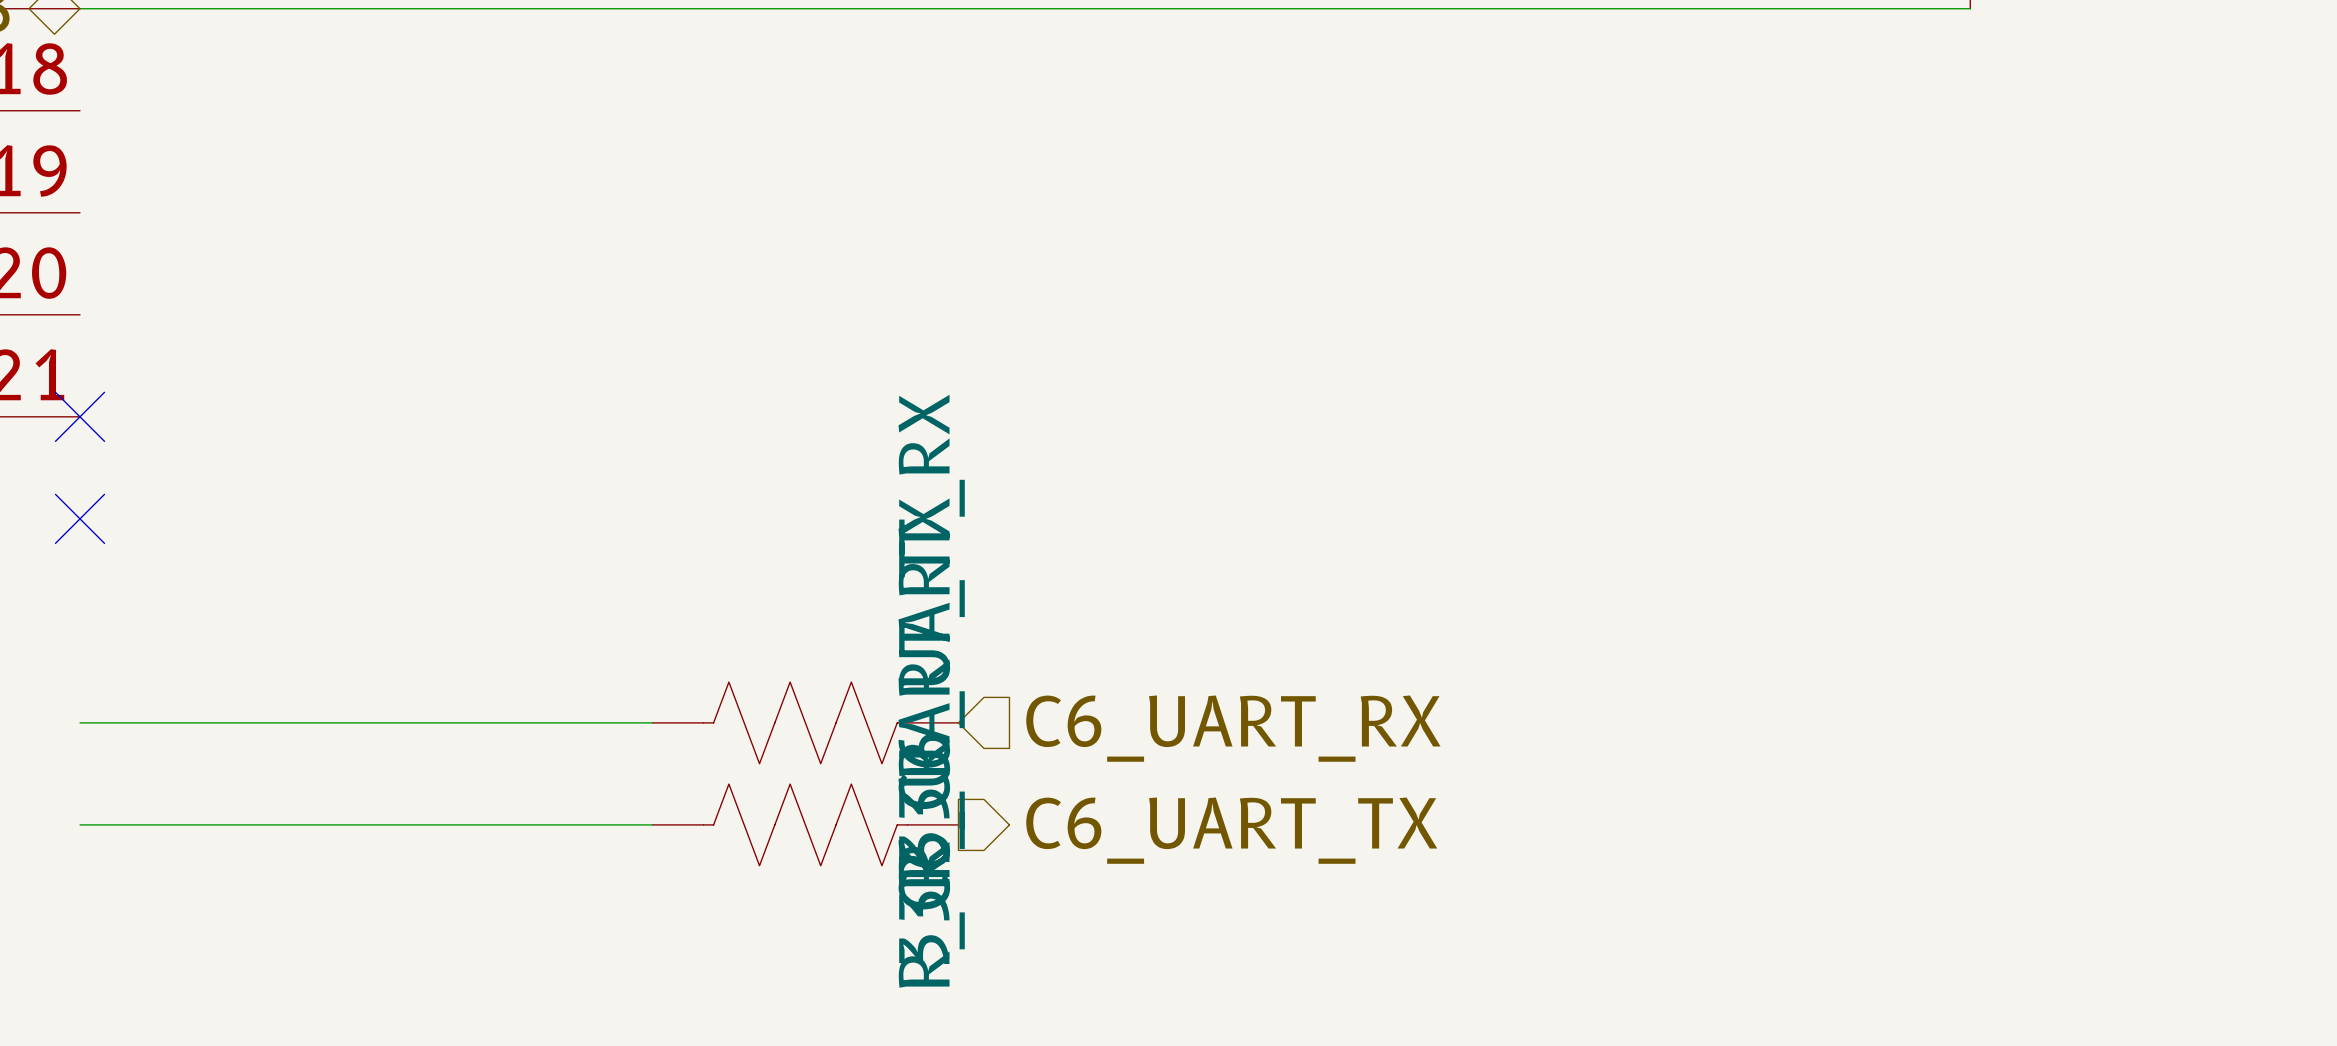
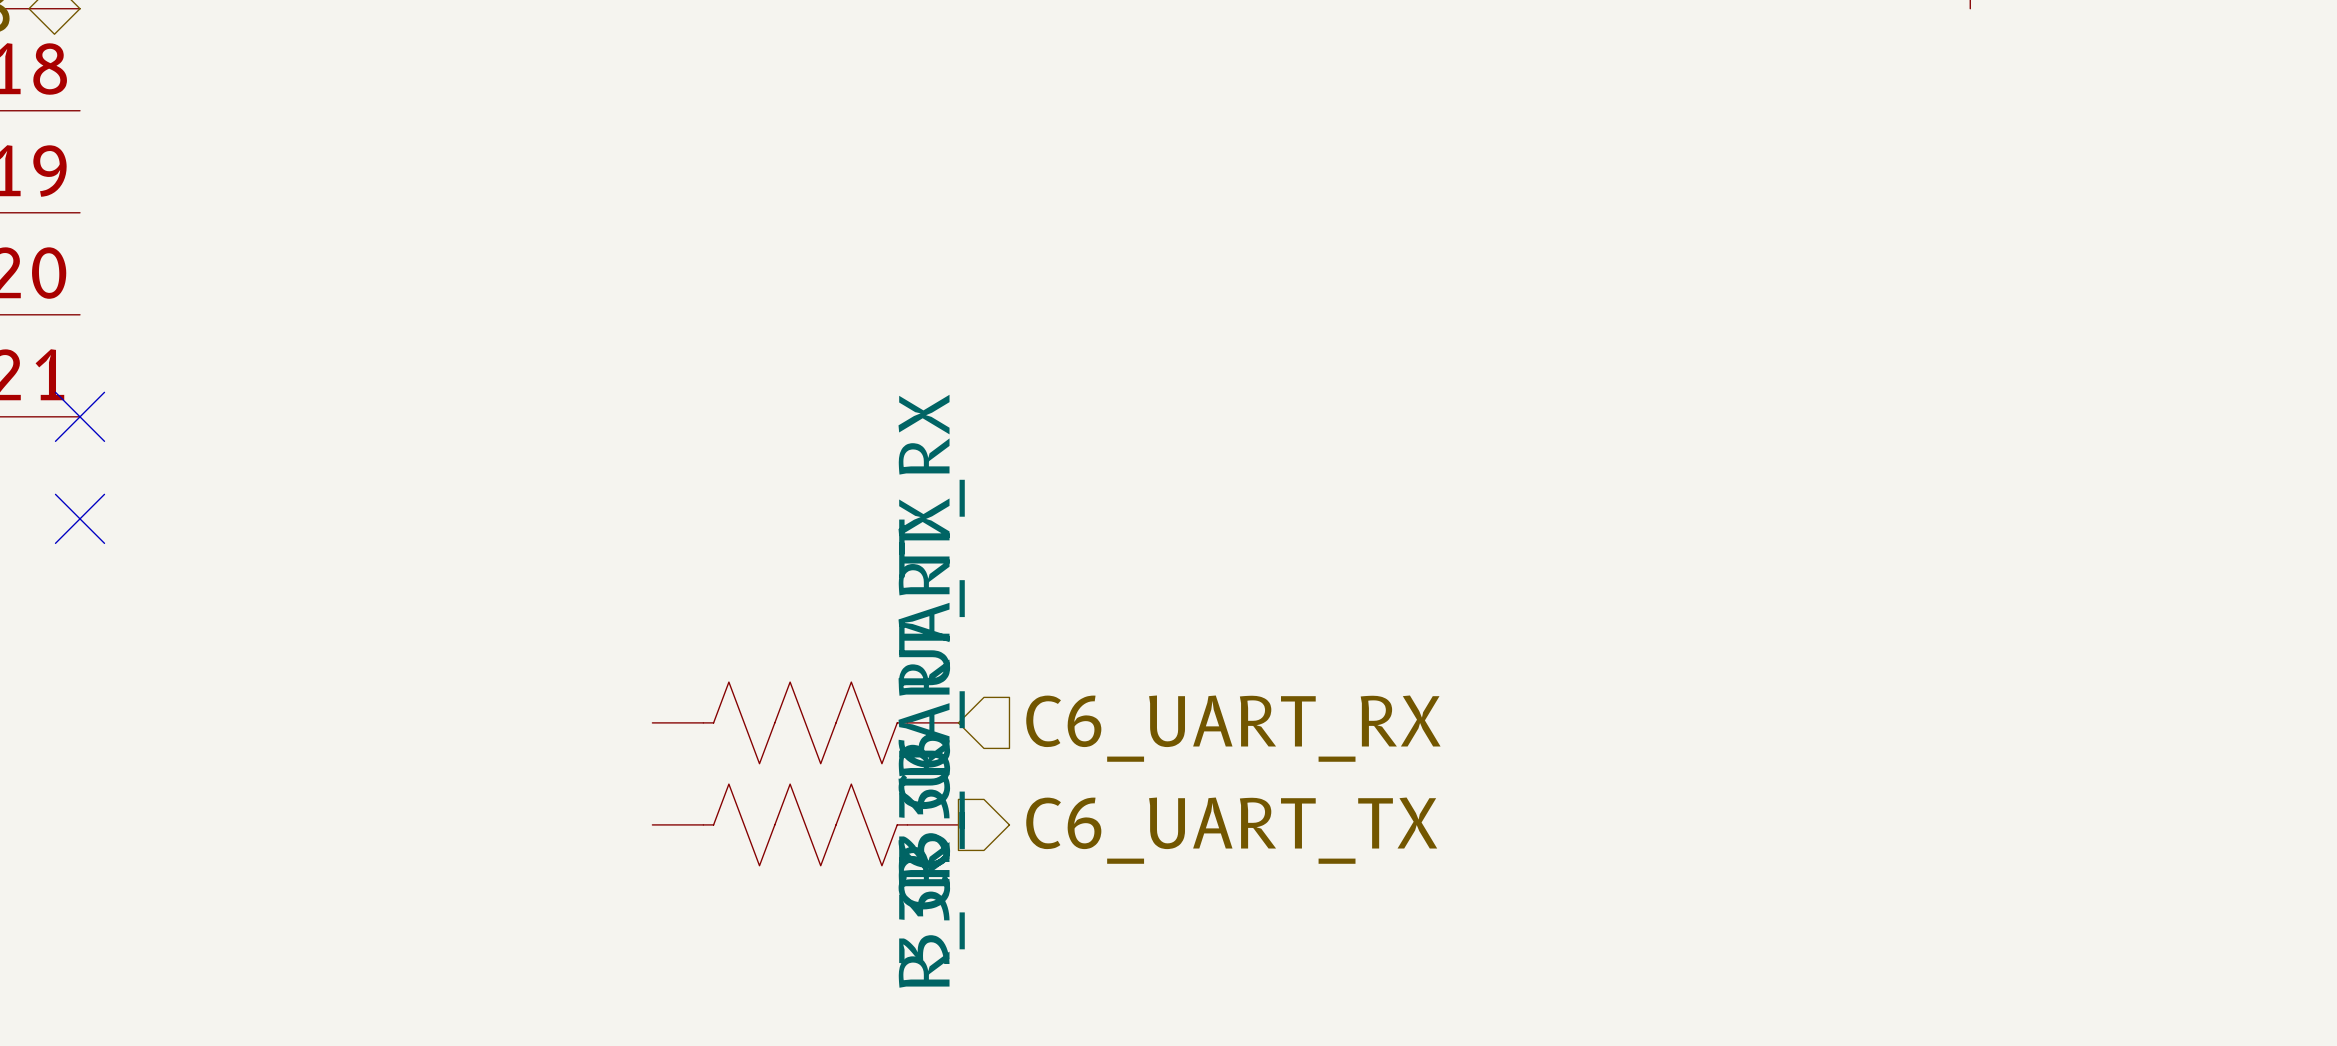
wire: (80, 8) (1970, 8) -> none
wire: (80, 722) (652, 722) -> none
wire: (80, 824) (652, 824) -> none

